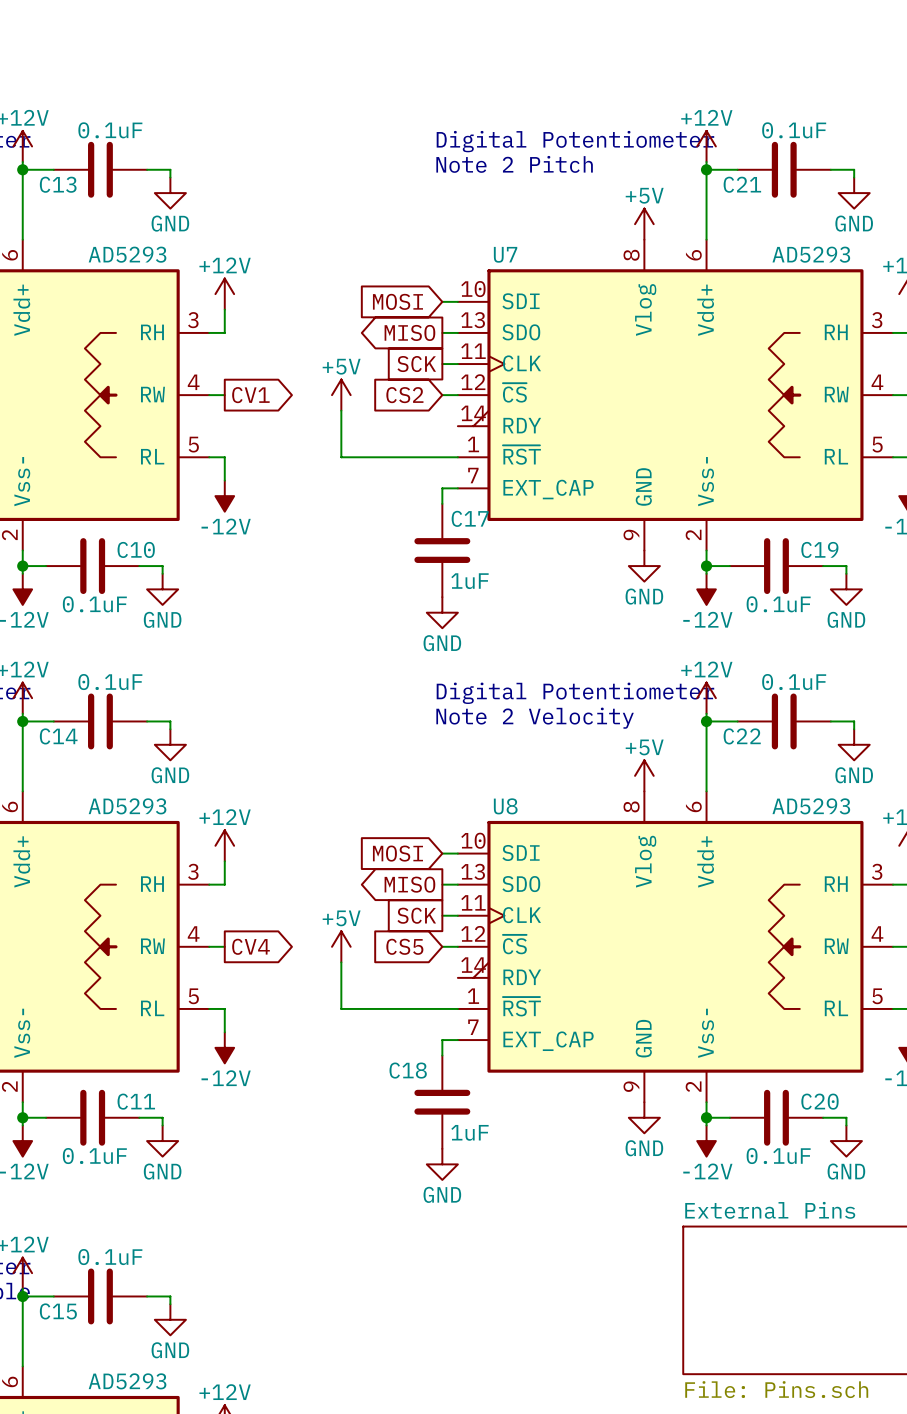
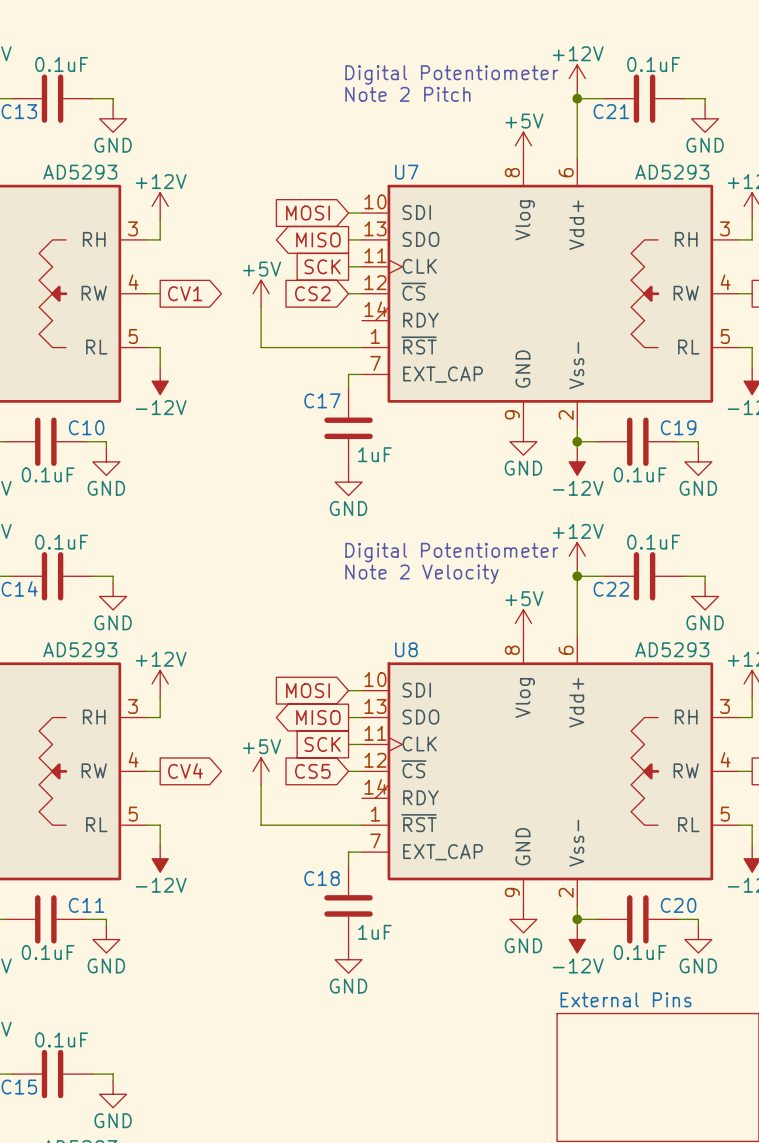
C17 name position: C17 (470, 518) -> C17 (322, 400)

